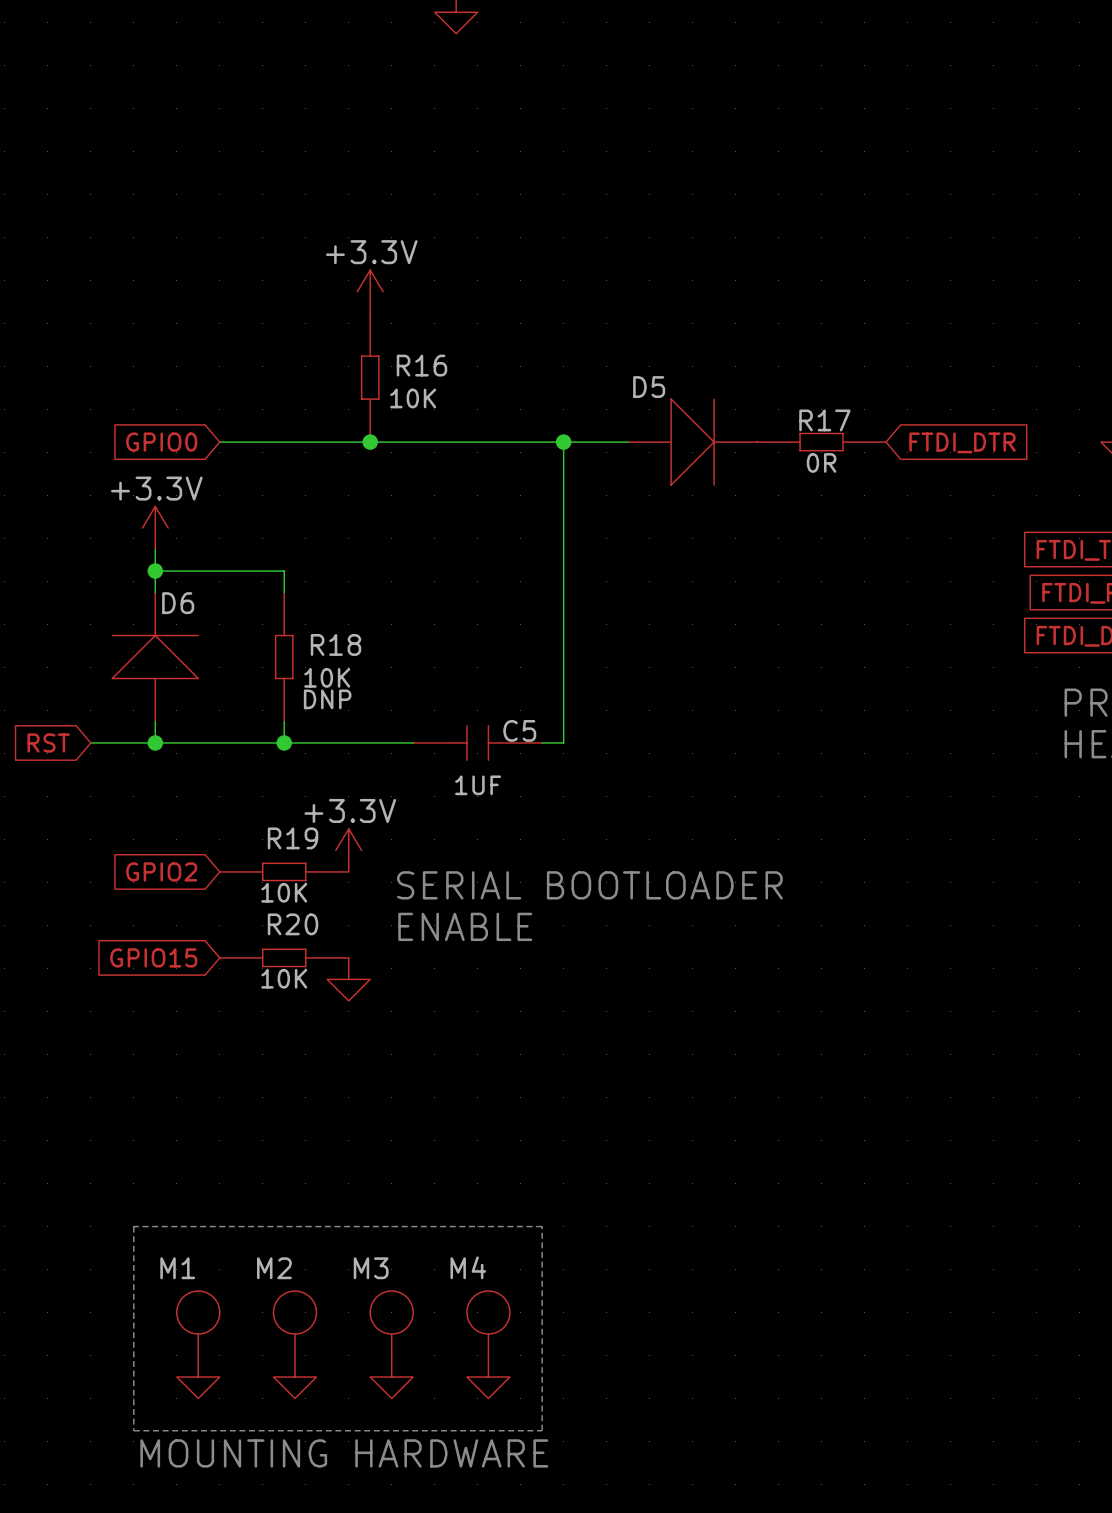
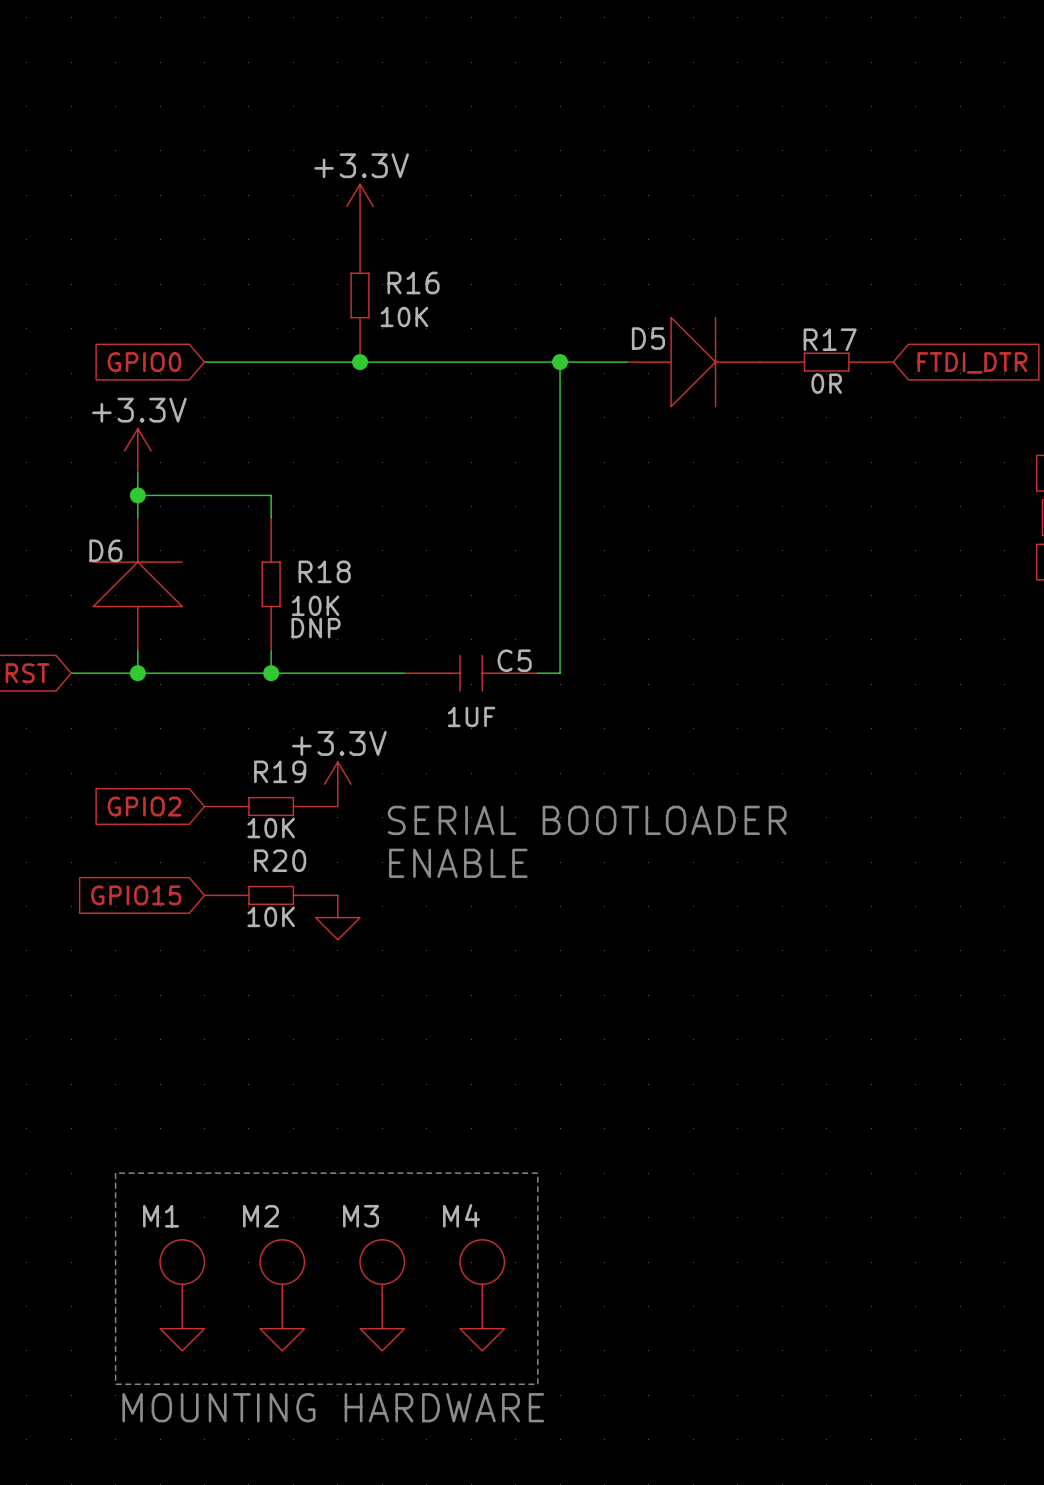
D5 name position: D5 (649, 387) -> D5 (648, 338)
D6 name position: D6 (178, 603) -> D6 (105, 550)

